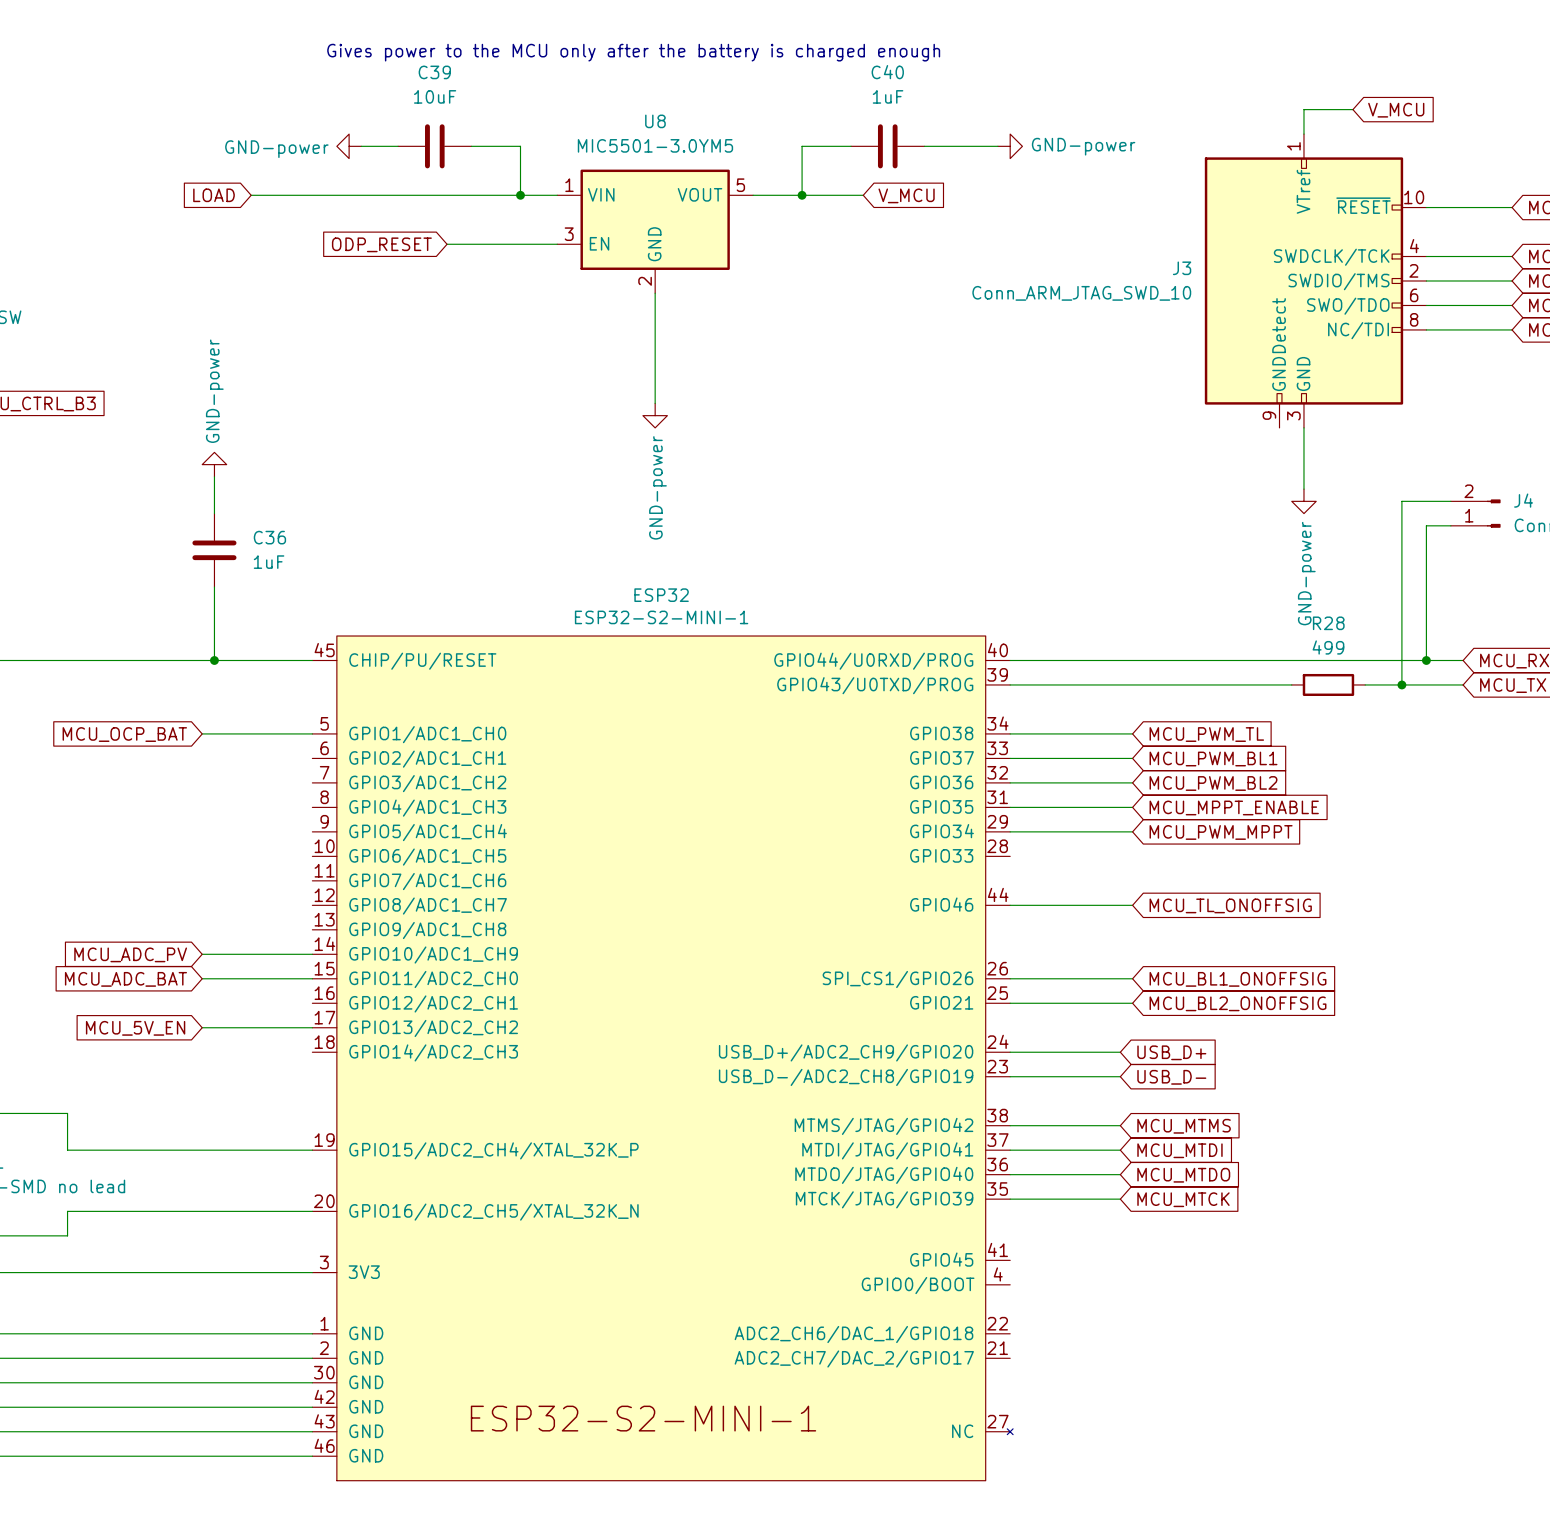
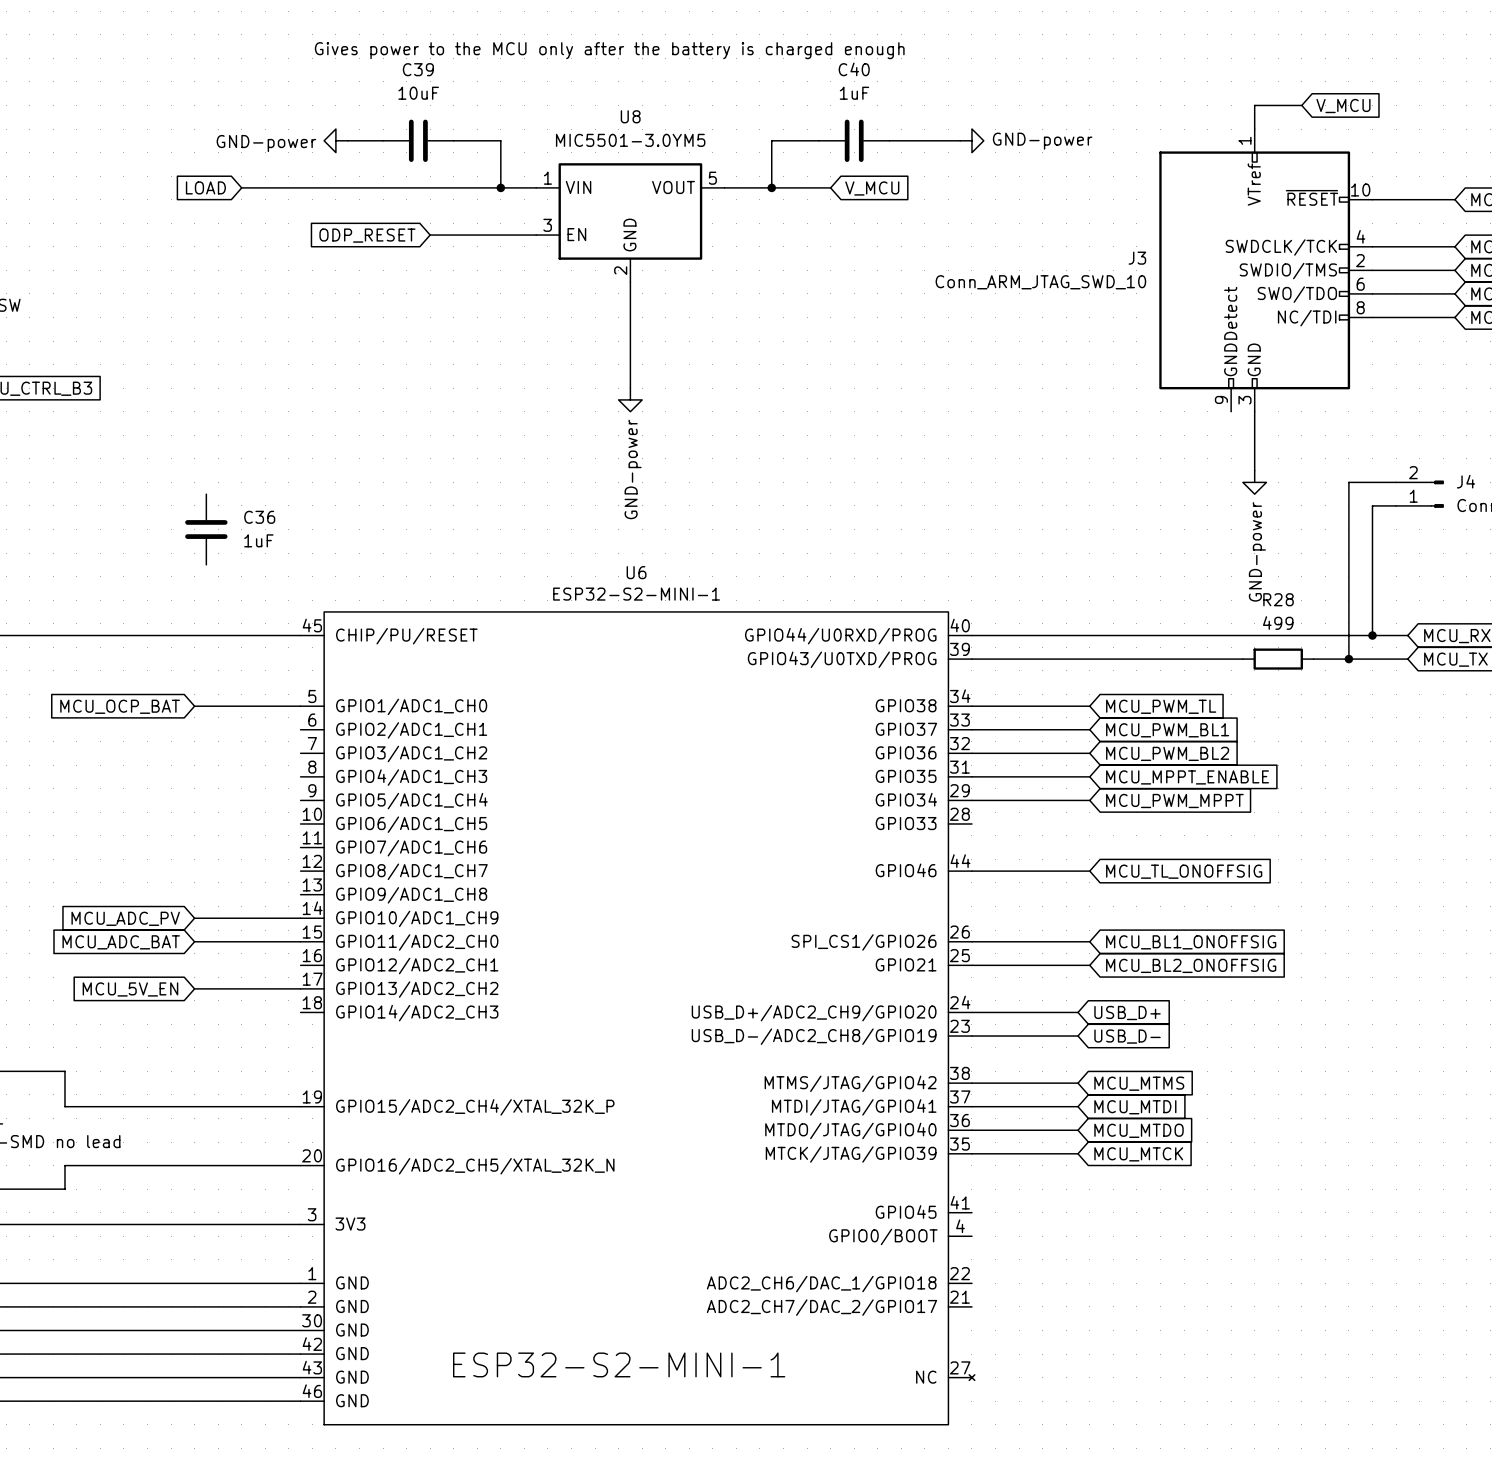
power symbol: GND-power (214, 464) -> none
wire: (214, 476) (214, 513) -> none
wire: (214, 587) (214, 660) -> none
ESP32 name: ESP32 (661, 595) -> U6 (636, 572)
junction: (214, 660) -> none

